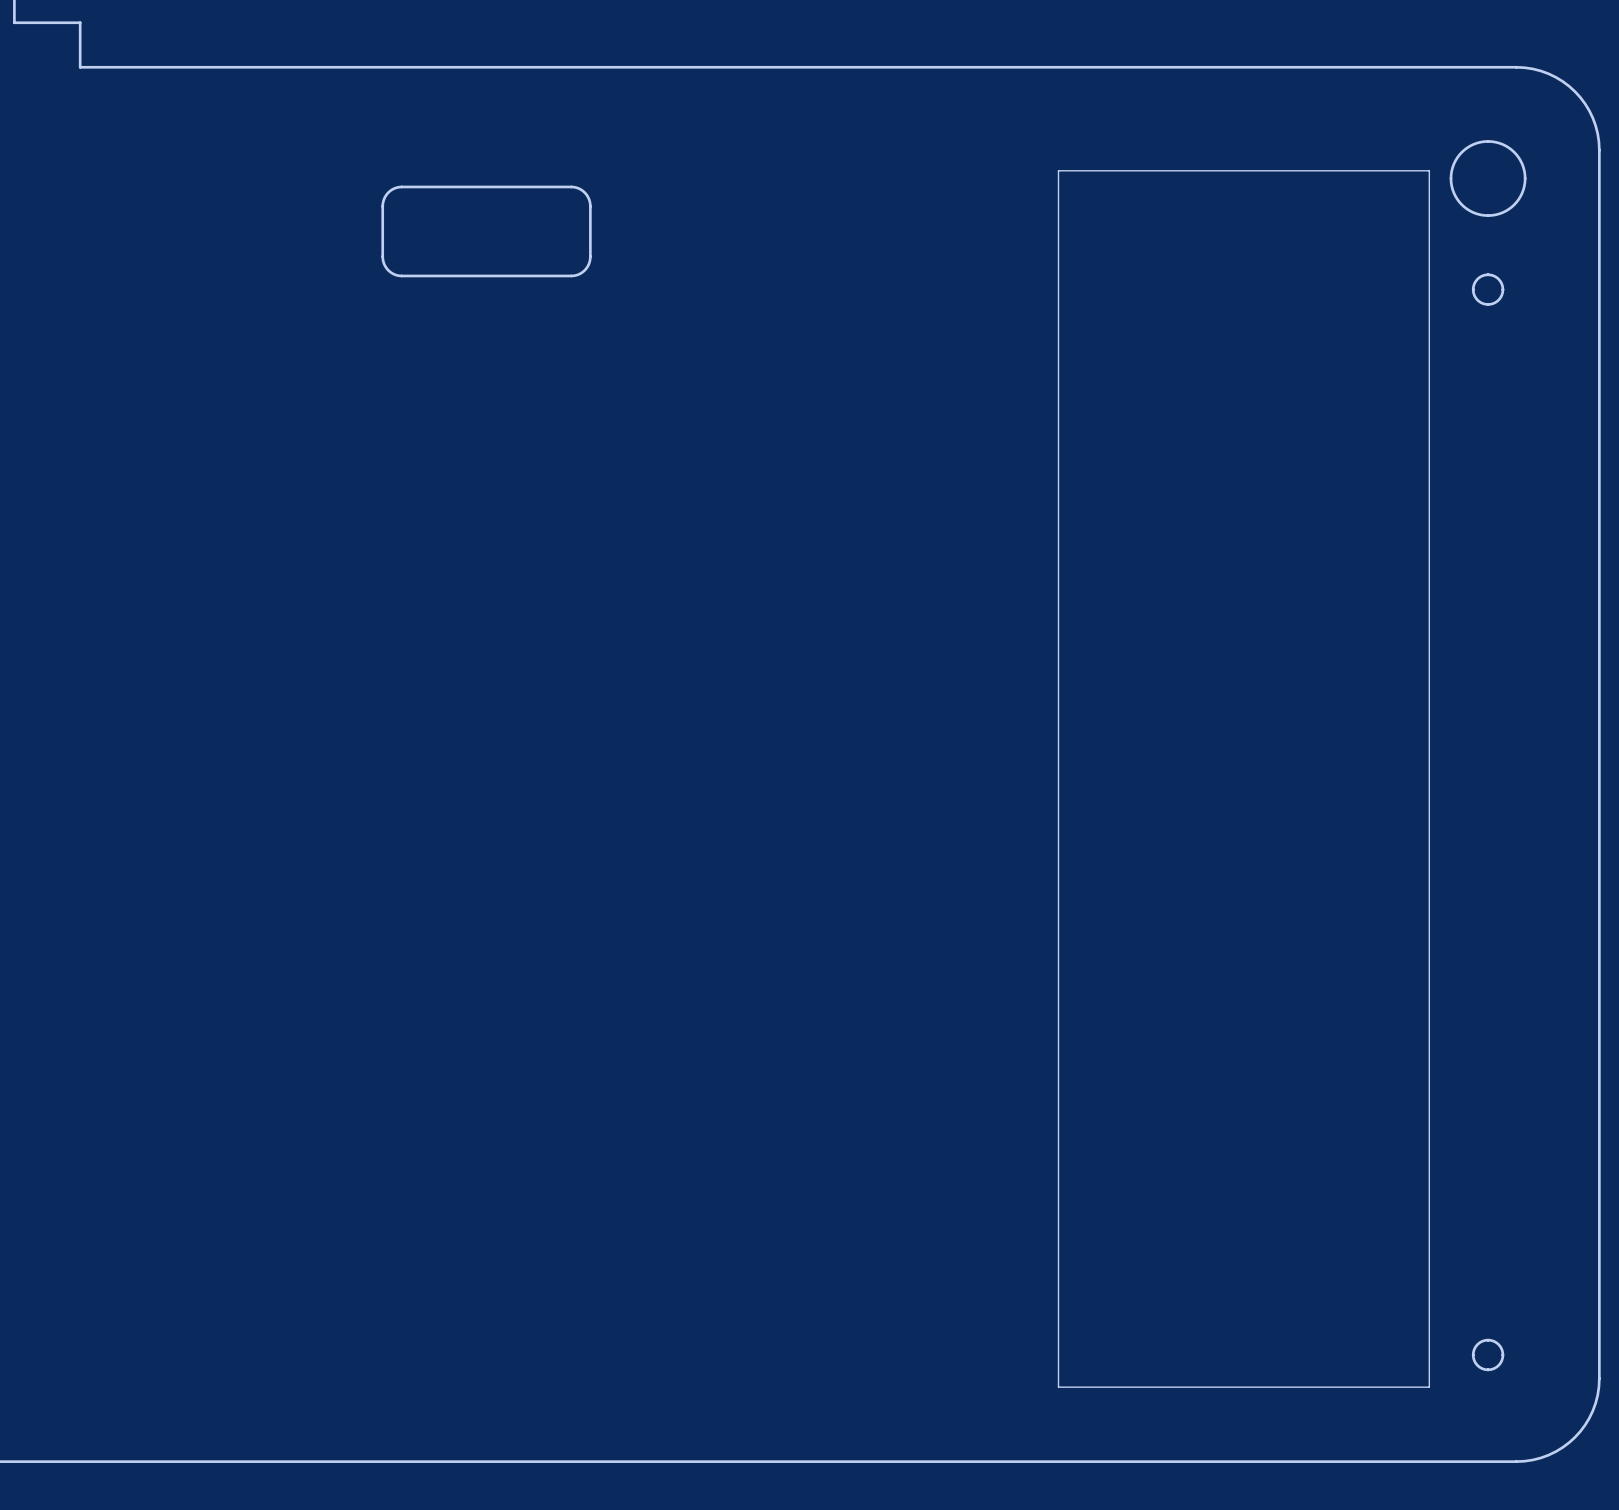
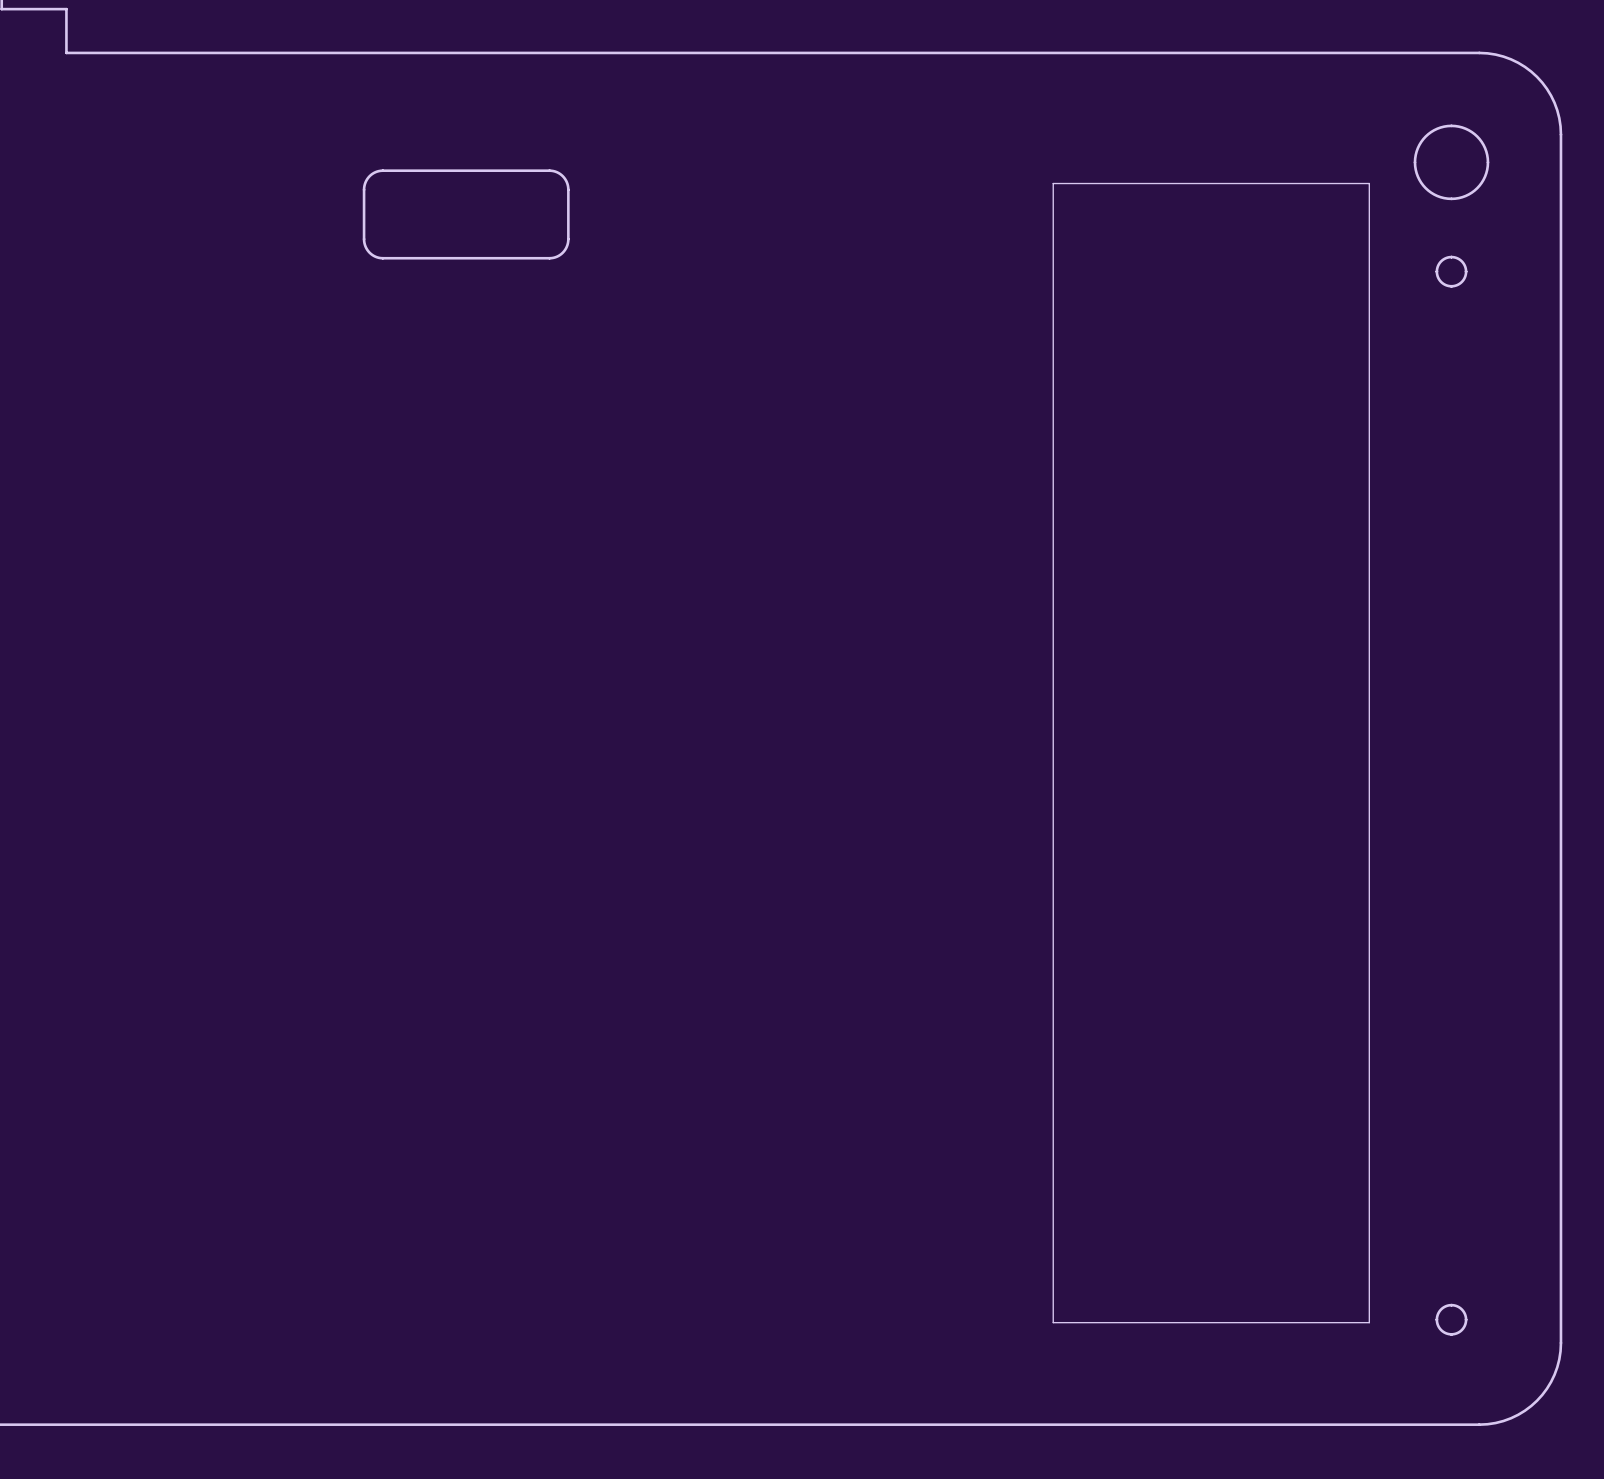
board edge: (1058, 170) (1429, 170) (1429, 1387) (1058, 1387) (1058, 170) -> (1053, 183) (1053, 1322) (1369, 1322) (1369, 183) (1053, 183)

